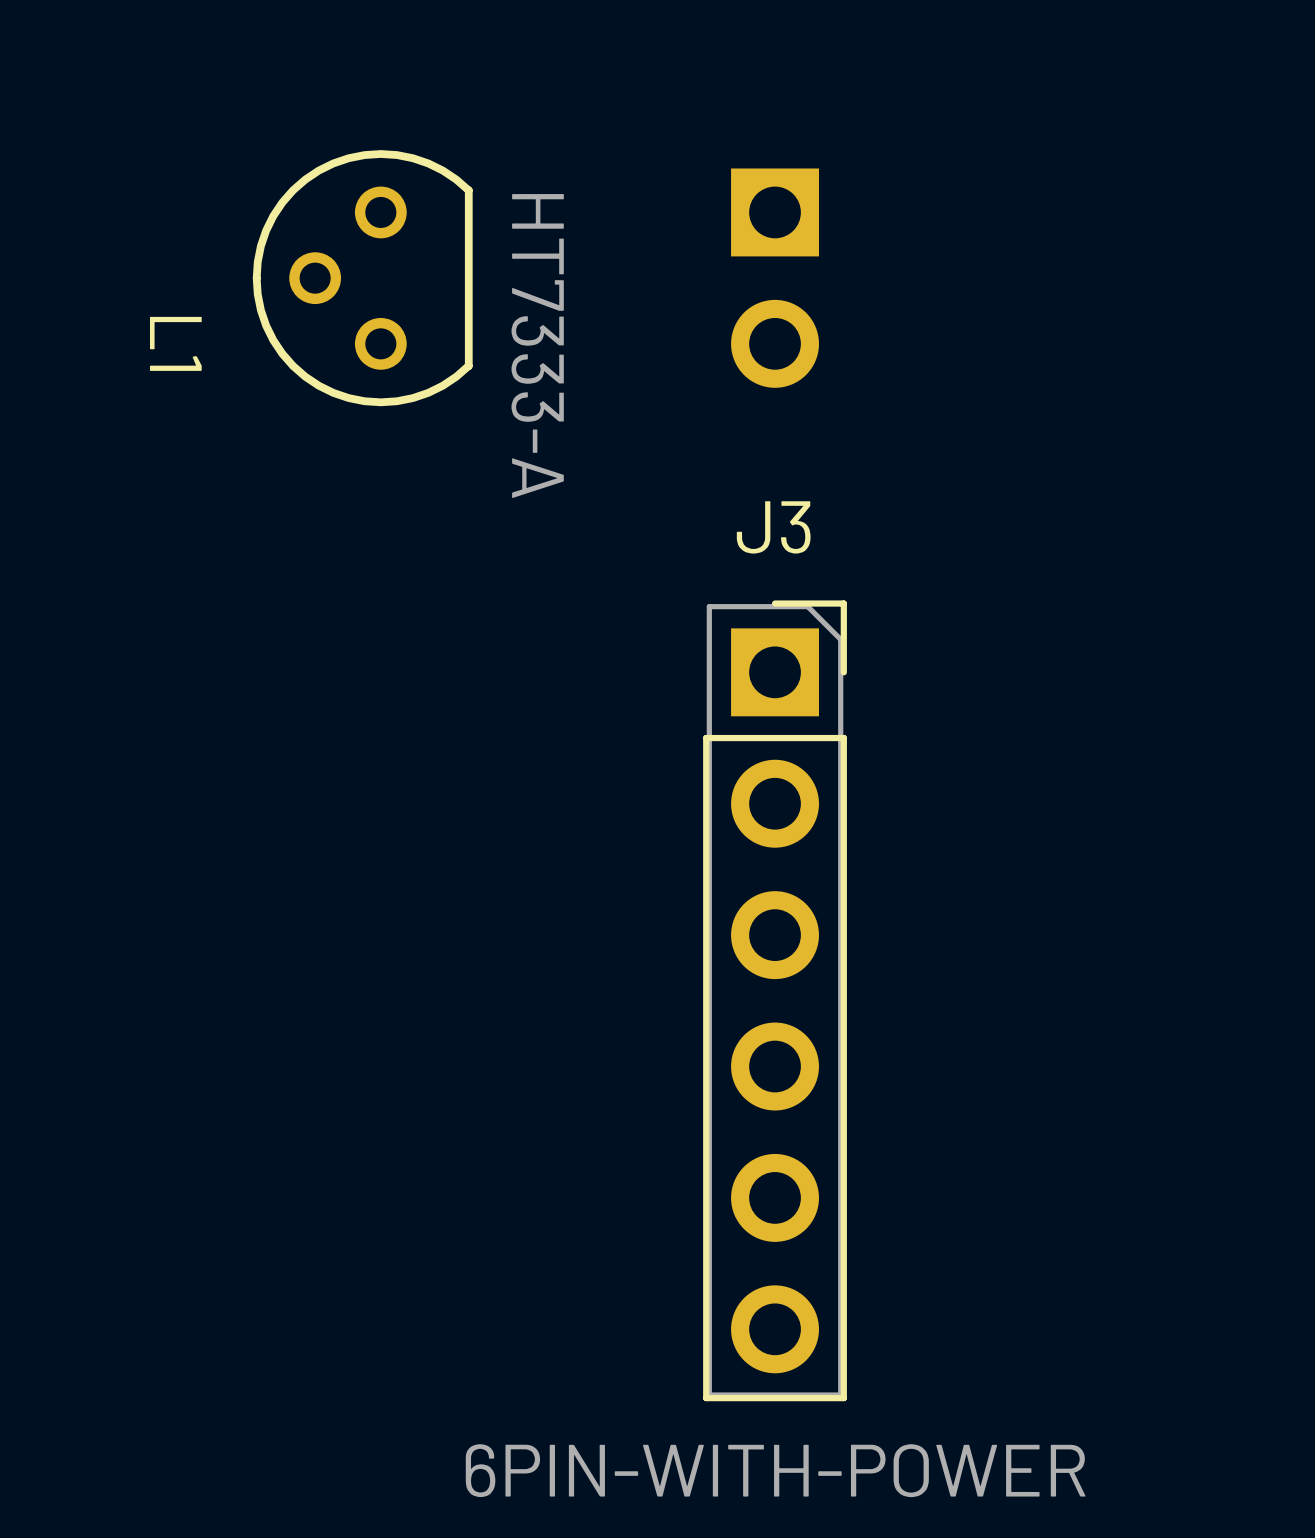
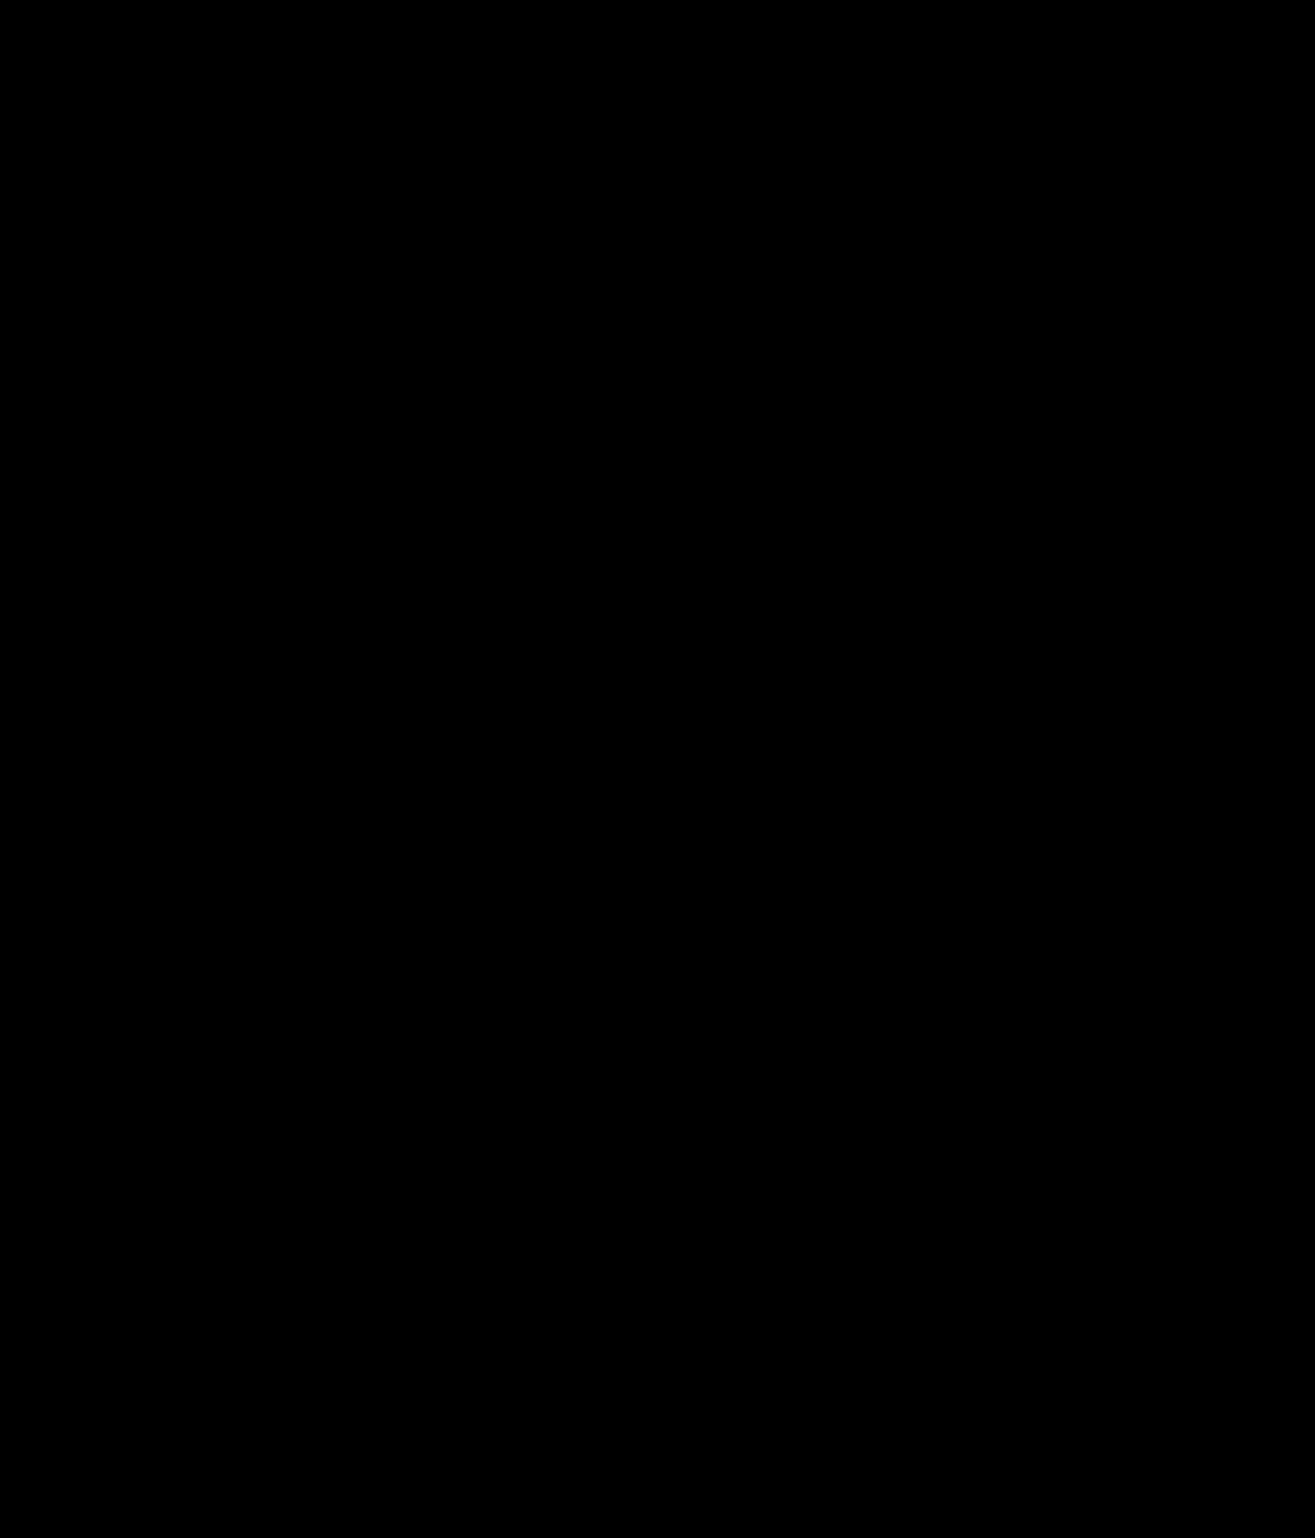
L1: HT7333-A (362, 278) -> none
part: (775, 278) -> none
J3: 6PIN-WITH-POWER (775, 1000) -> none

